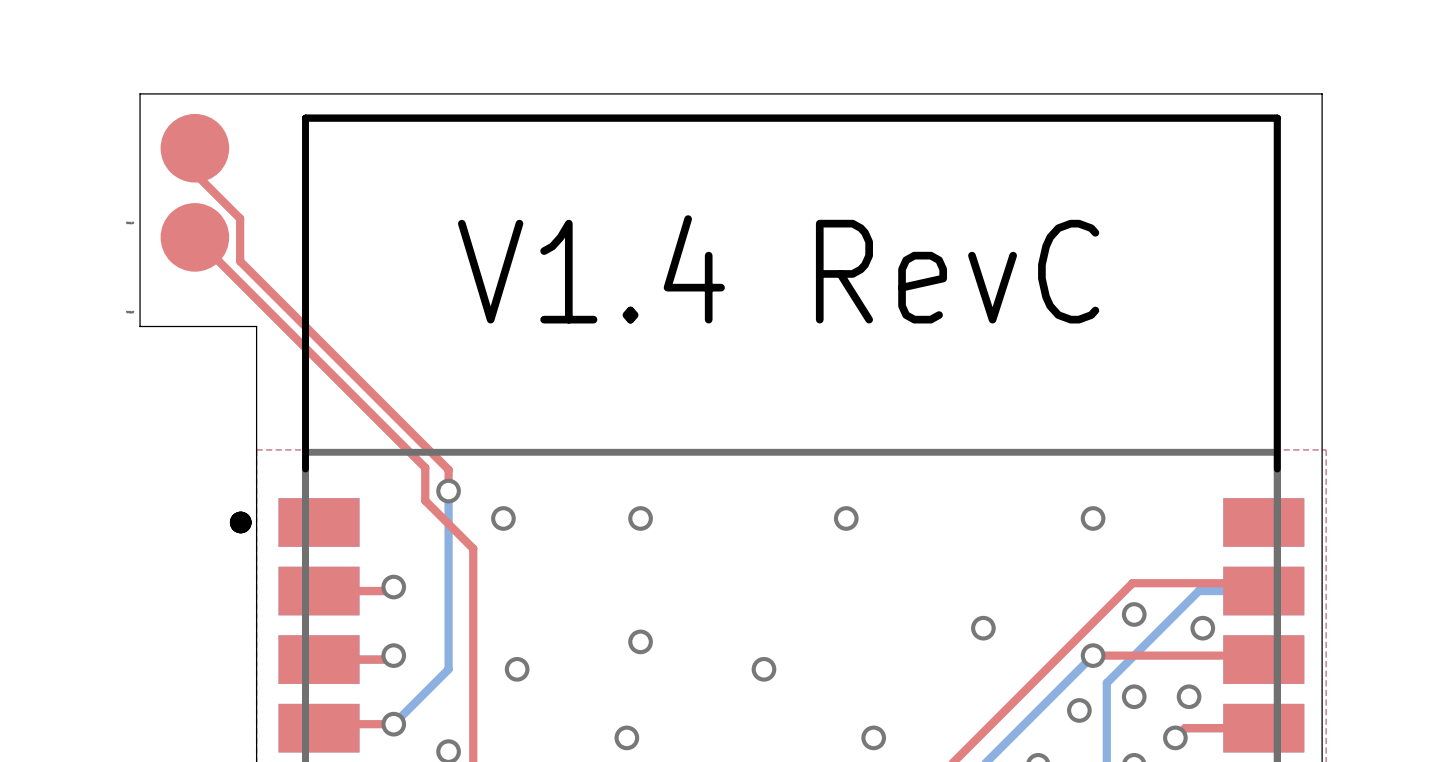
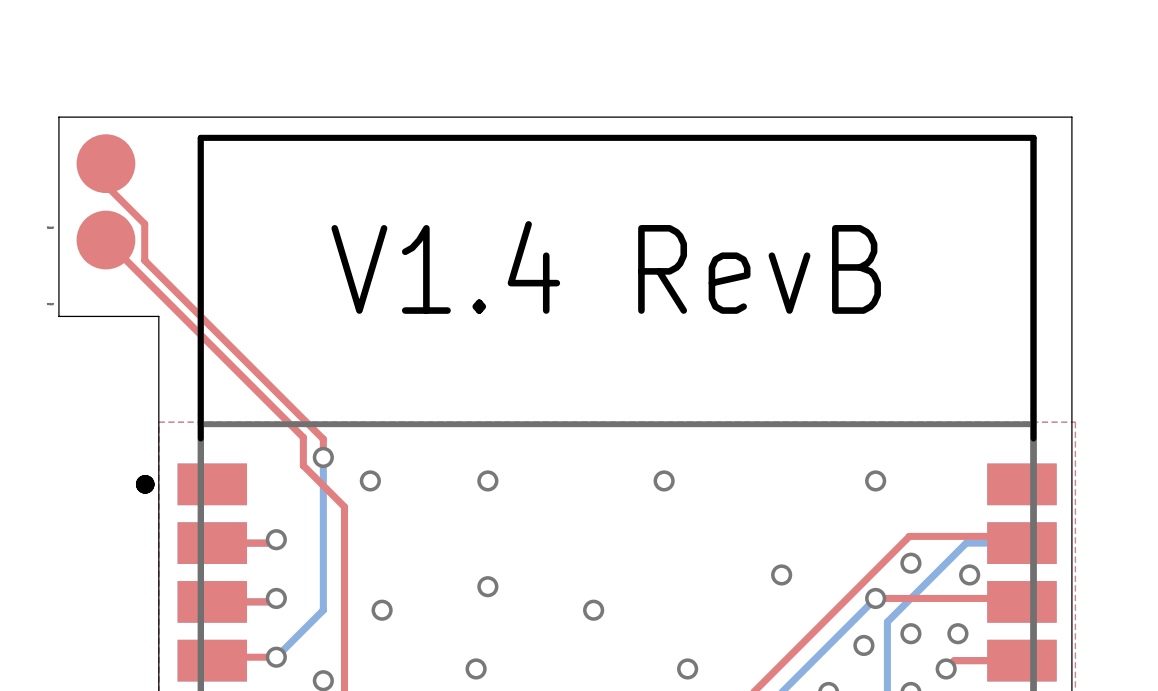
text: V1.4 RevC (778, 269) -> V1.4 RevB (606, 267)

